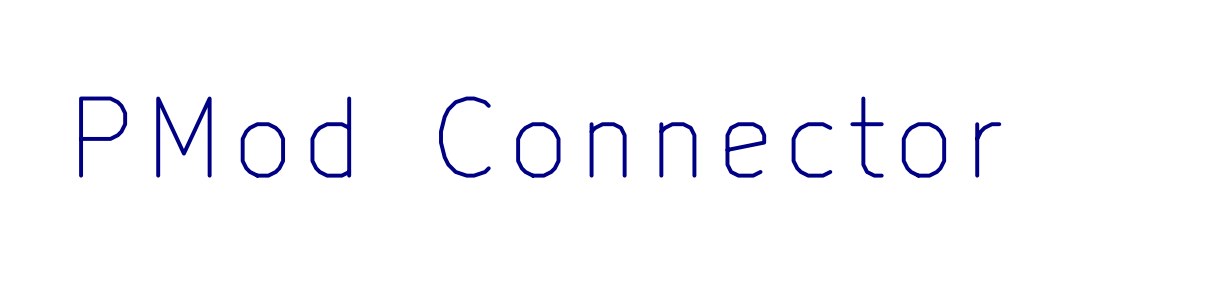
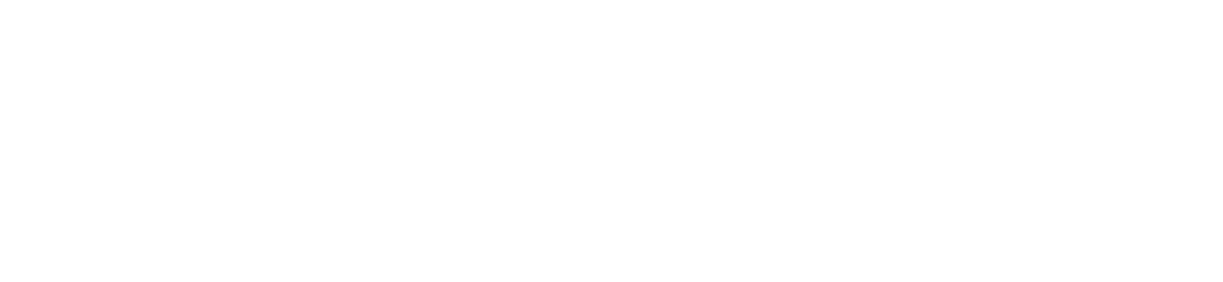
text: PMod Connector (540, 137) -> none

